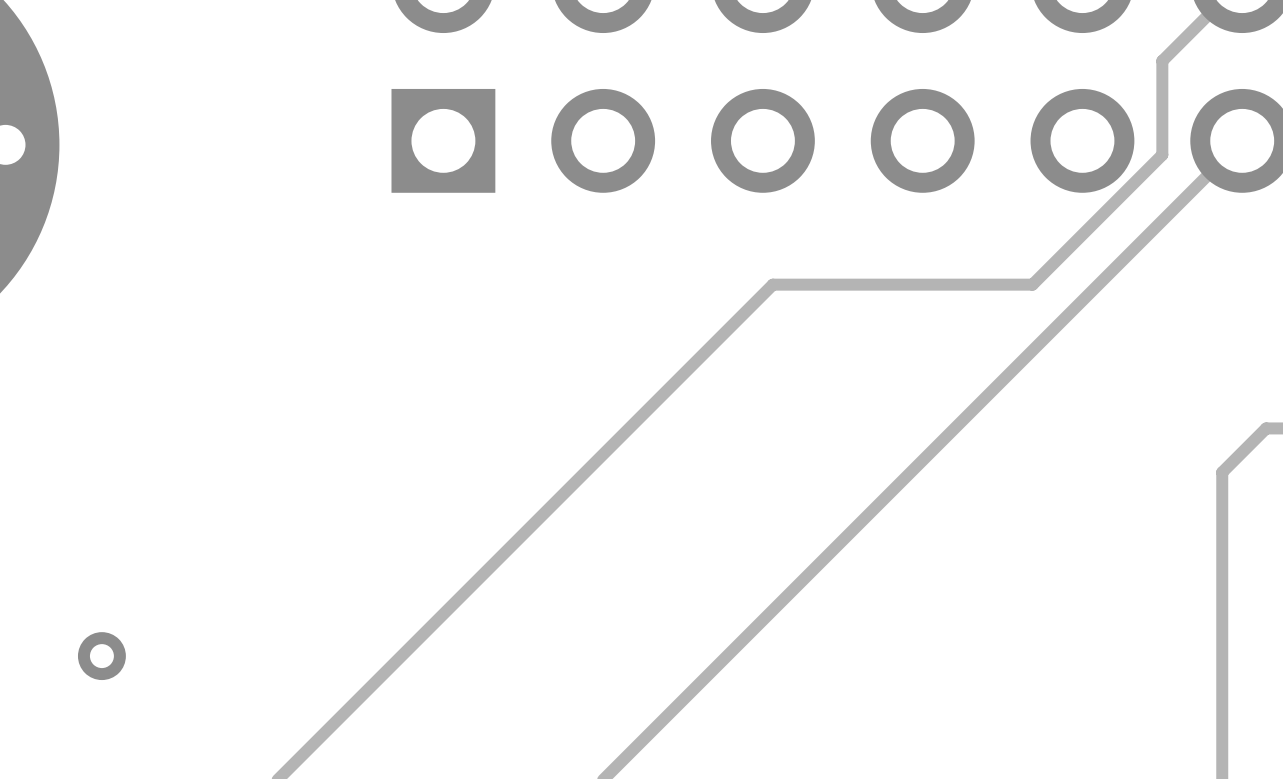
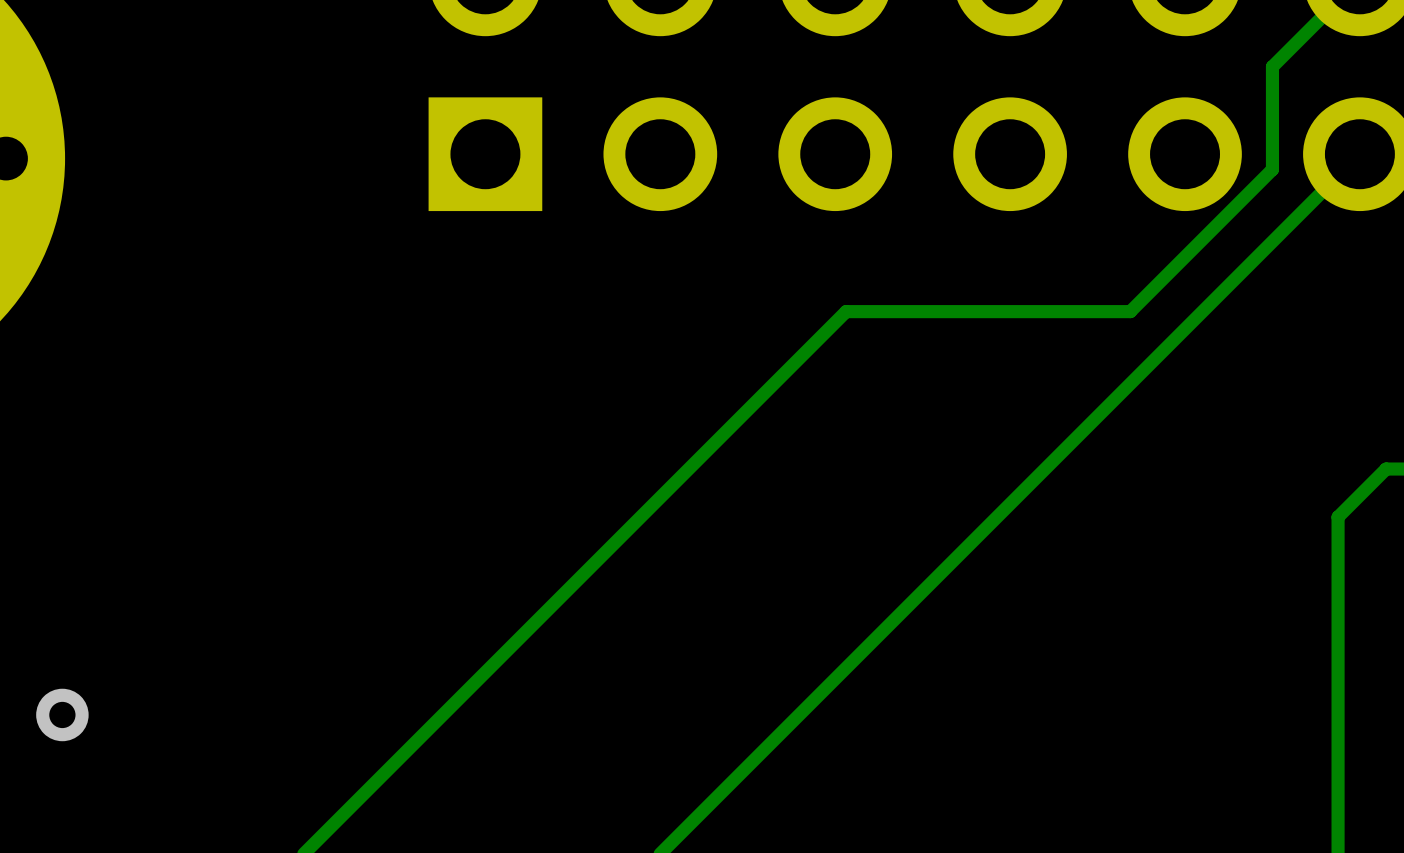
via position: (101, 656) -> (62, 714)

